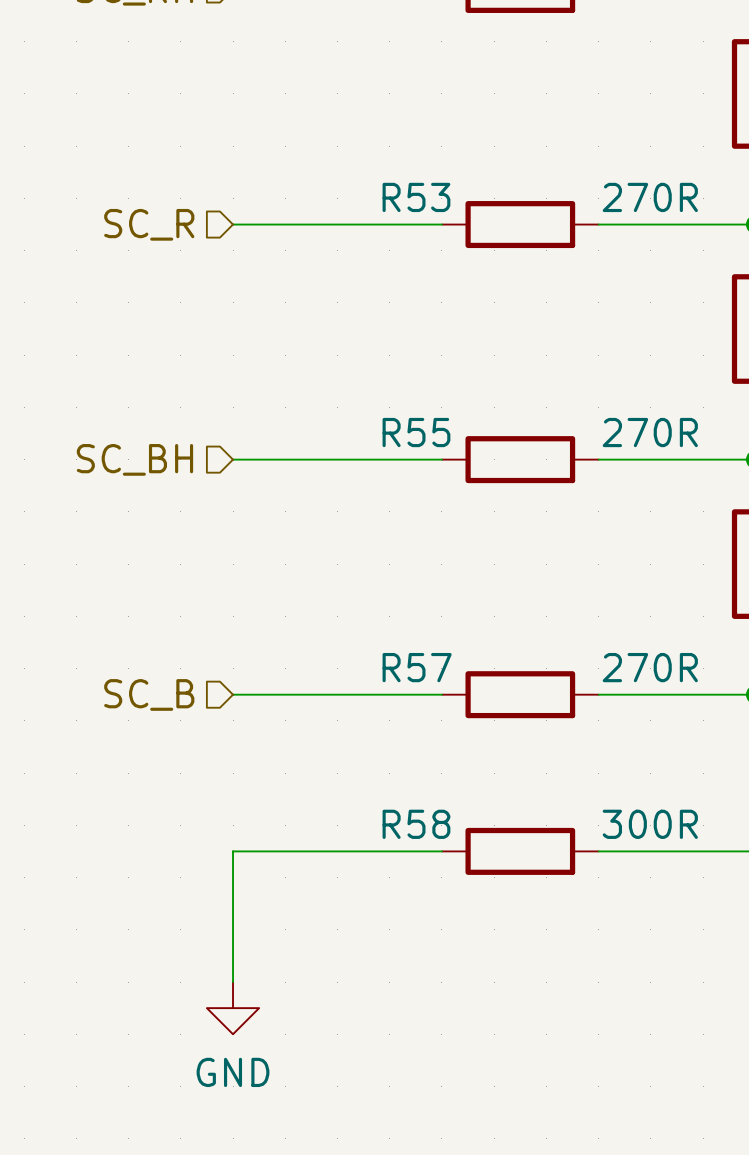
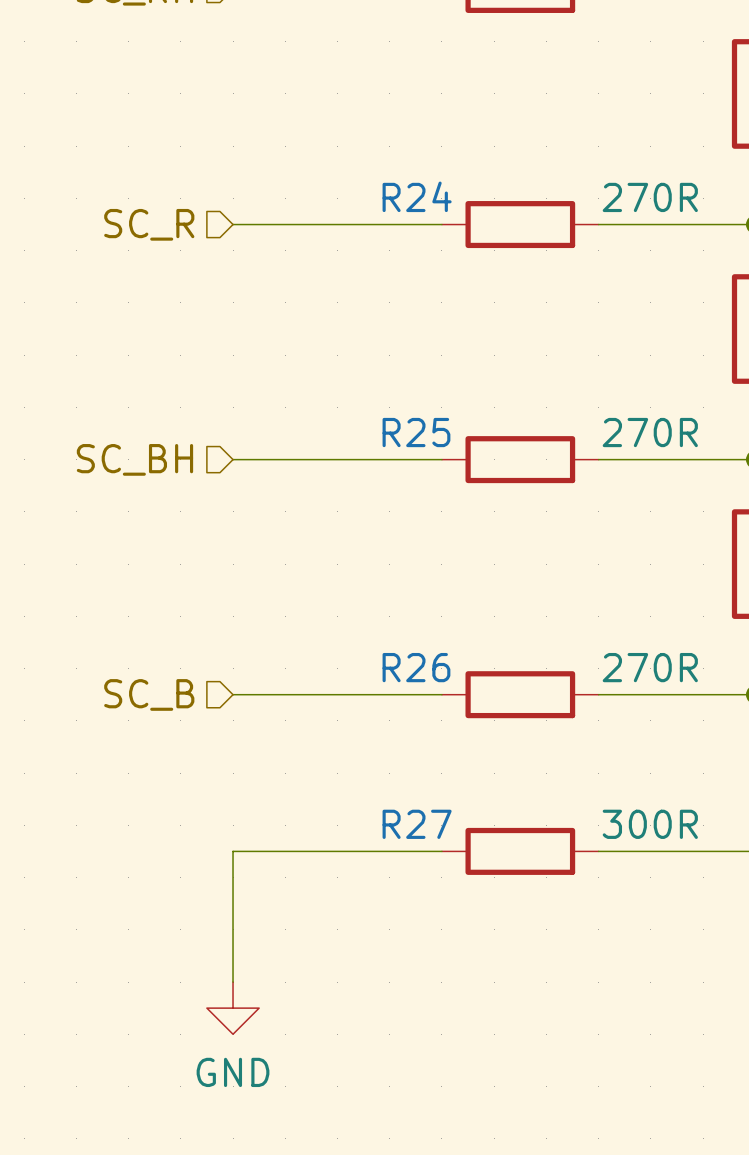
R53 name: R53 (416, 197) -> R24 (417, 196)
R55 name: R55 (416, 432) -> R25 (416, 432)
R57 name: R57 (417, 667) -> R26 (416, 667)
R58 name: R58 (416, 824) -> R27 (417, 824)

